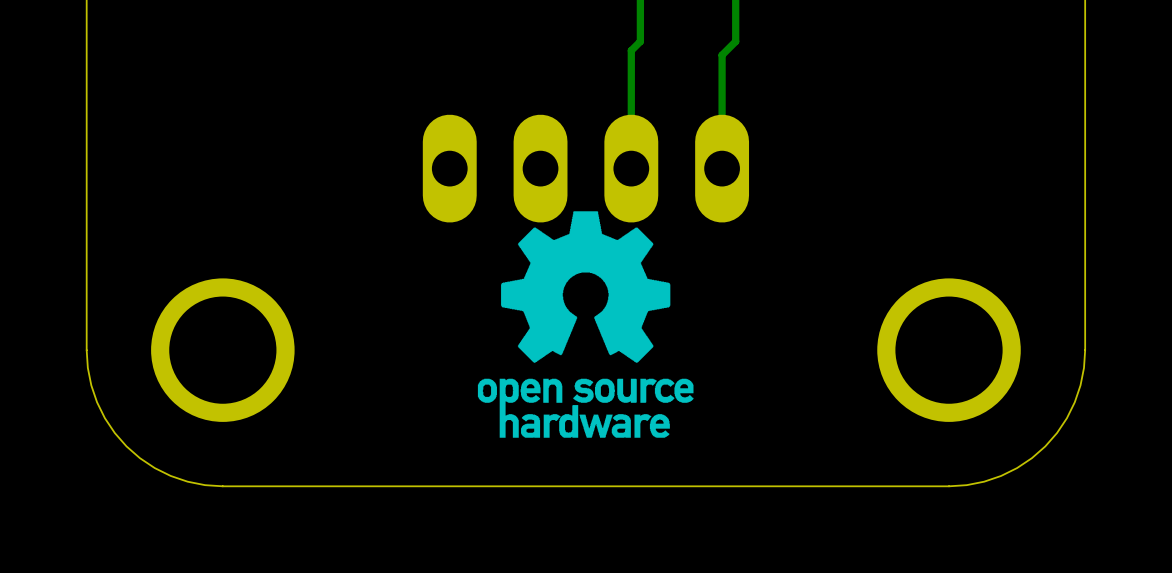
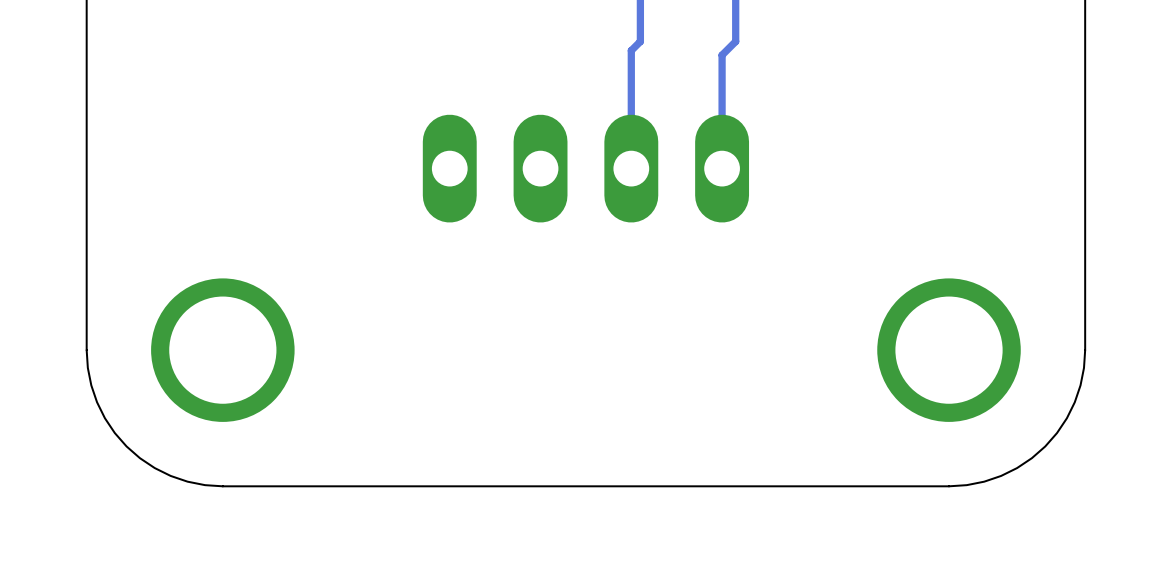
drawing: [477, 211, 694, 438] -> none

